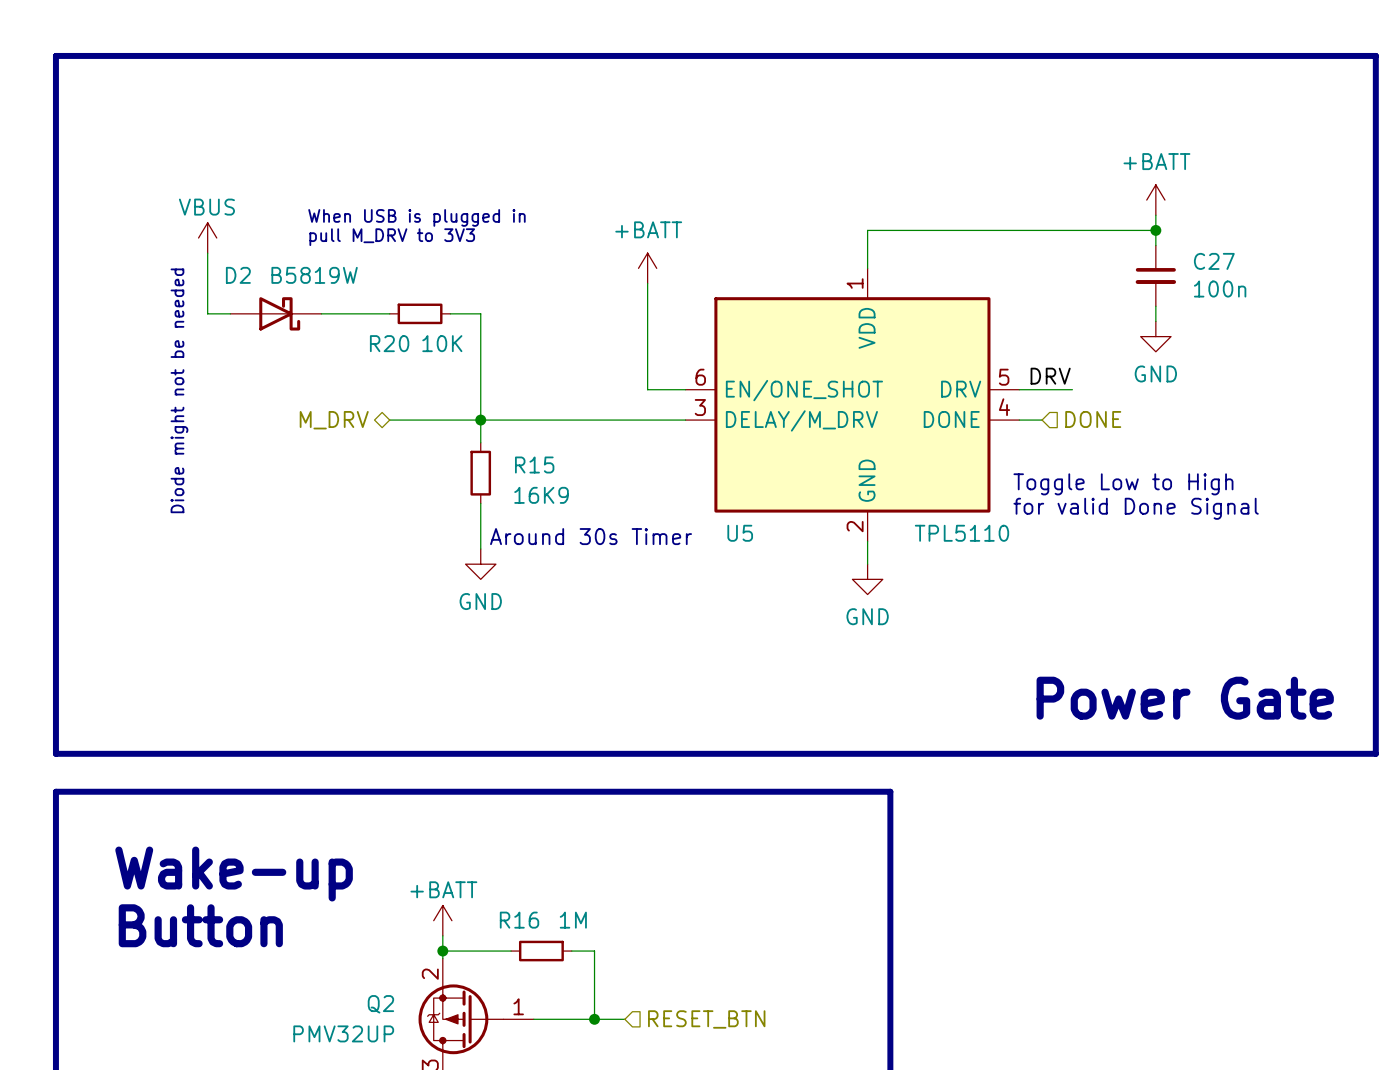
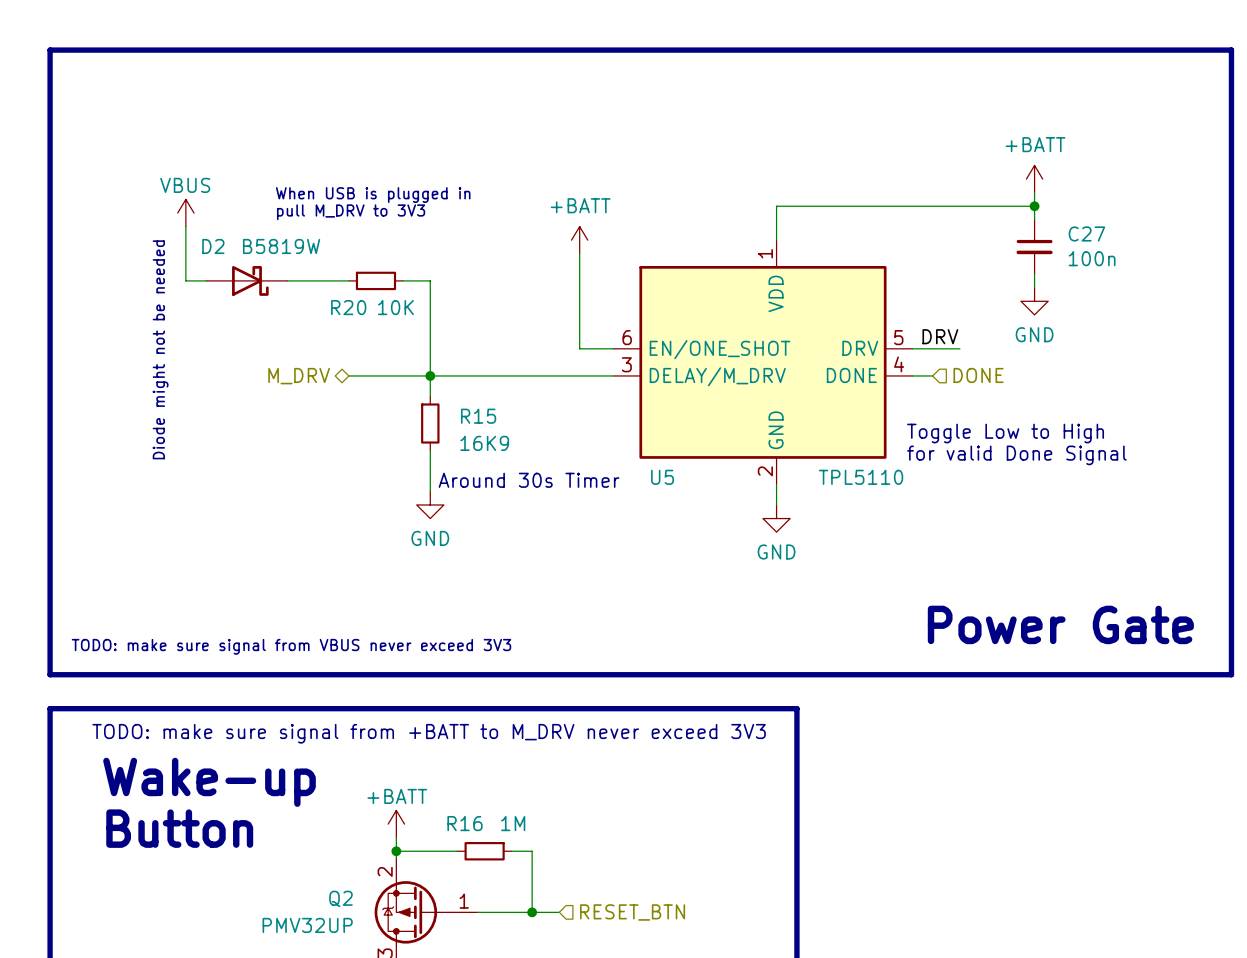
text: none -> TODO: make sure signal from VBUS never exceed 3V3 (291, 646)
text: none -> TODO: make sure signal from +BATT to M_DRV never exceed 3V3 (429, 733)

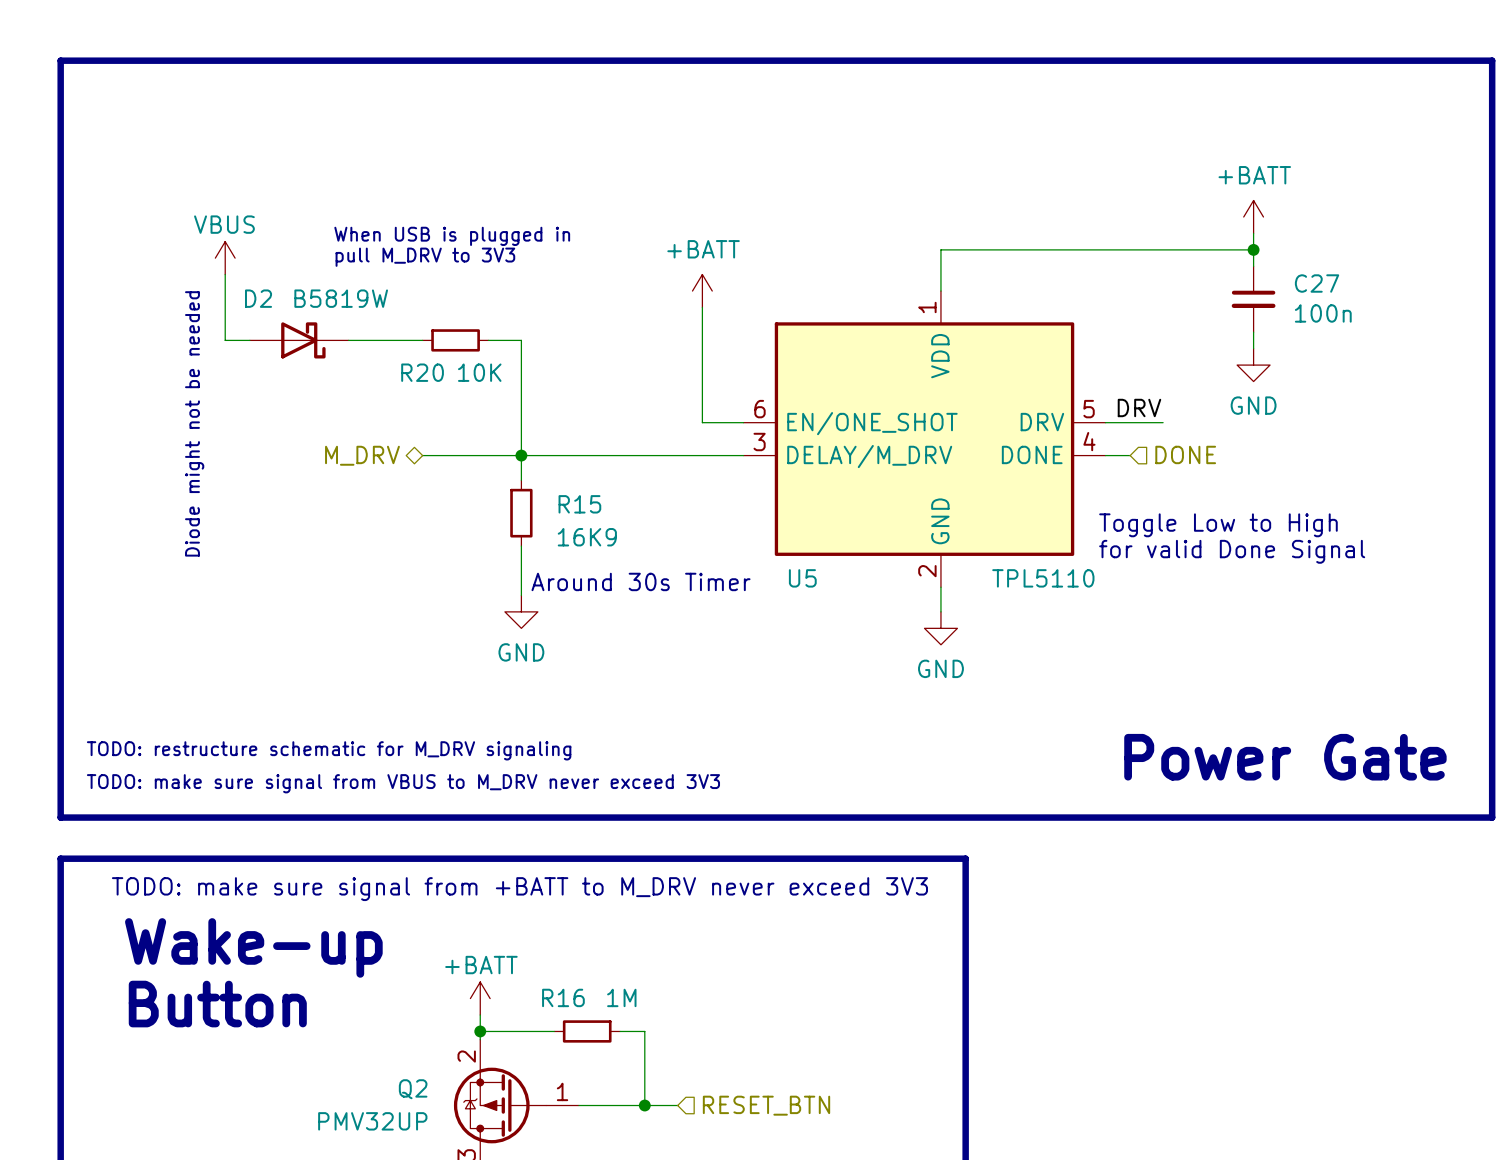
text: none -> TODO: restructure schematic for M_DRV signaling (329, 750)
text: TODO: make sure signal from VBUS never exceed 3V3 (291, 646) -> TODO: make sure signal from VBUS to M_DRV never exceed 3V3 (403, 783)

